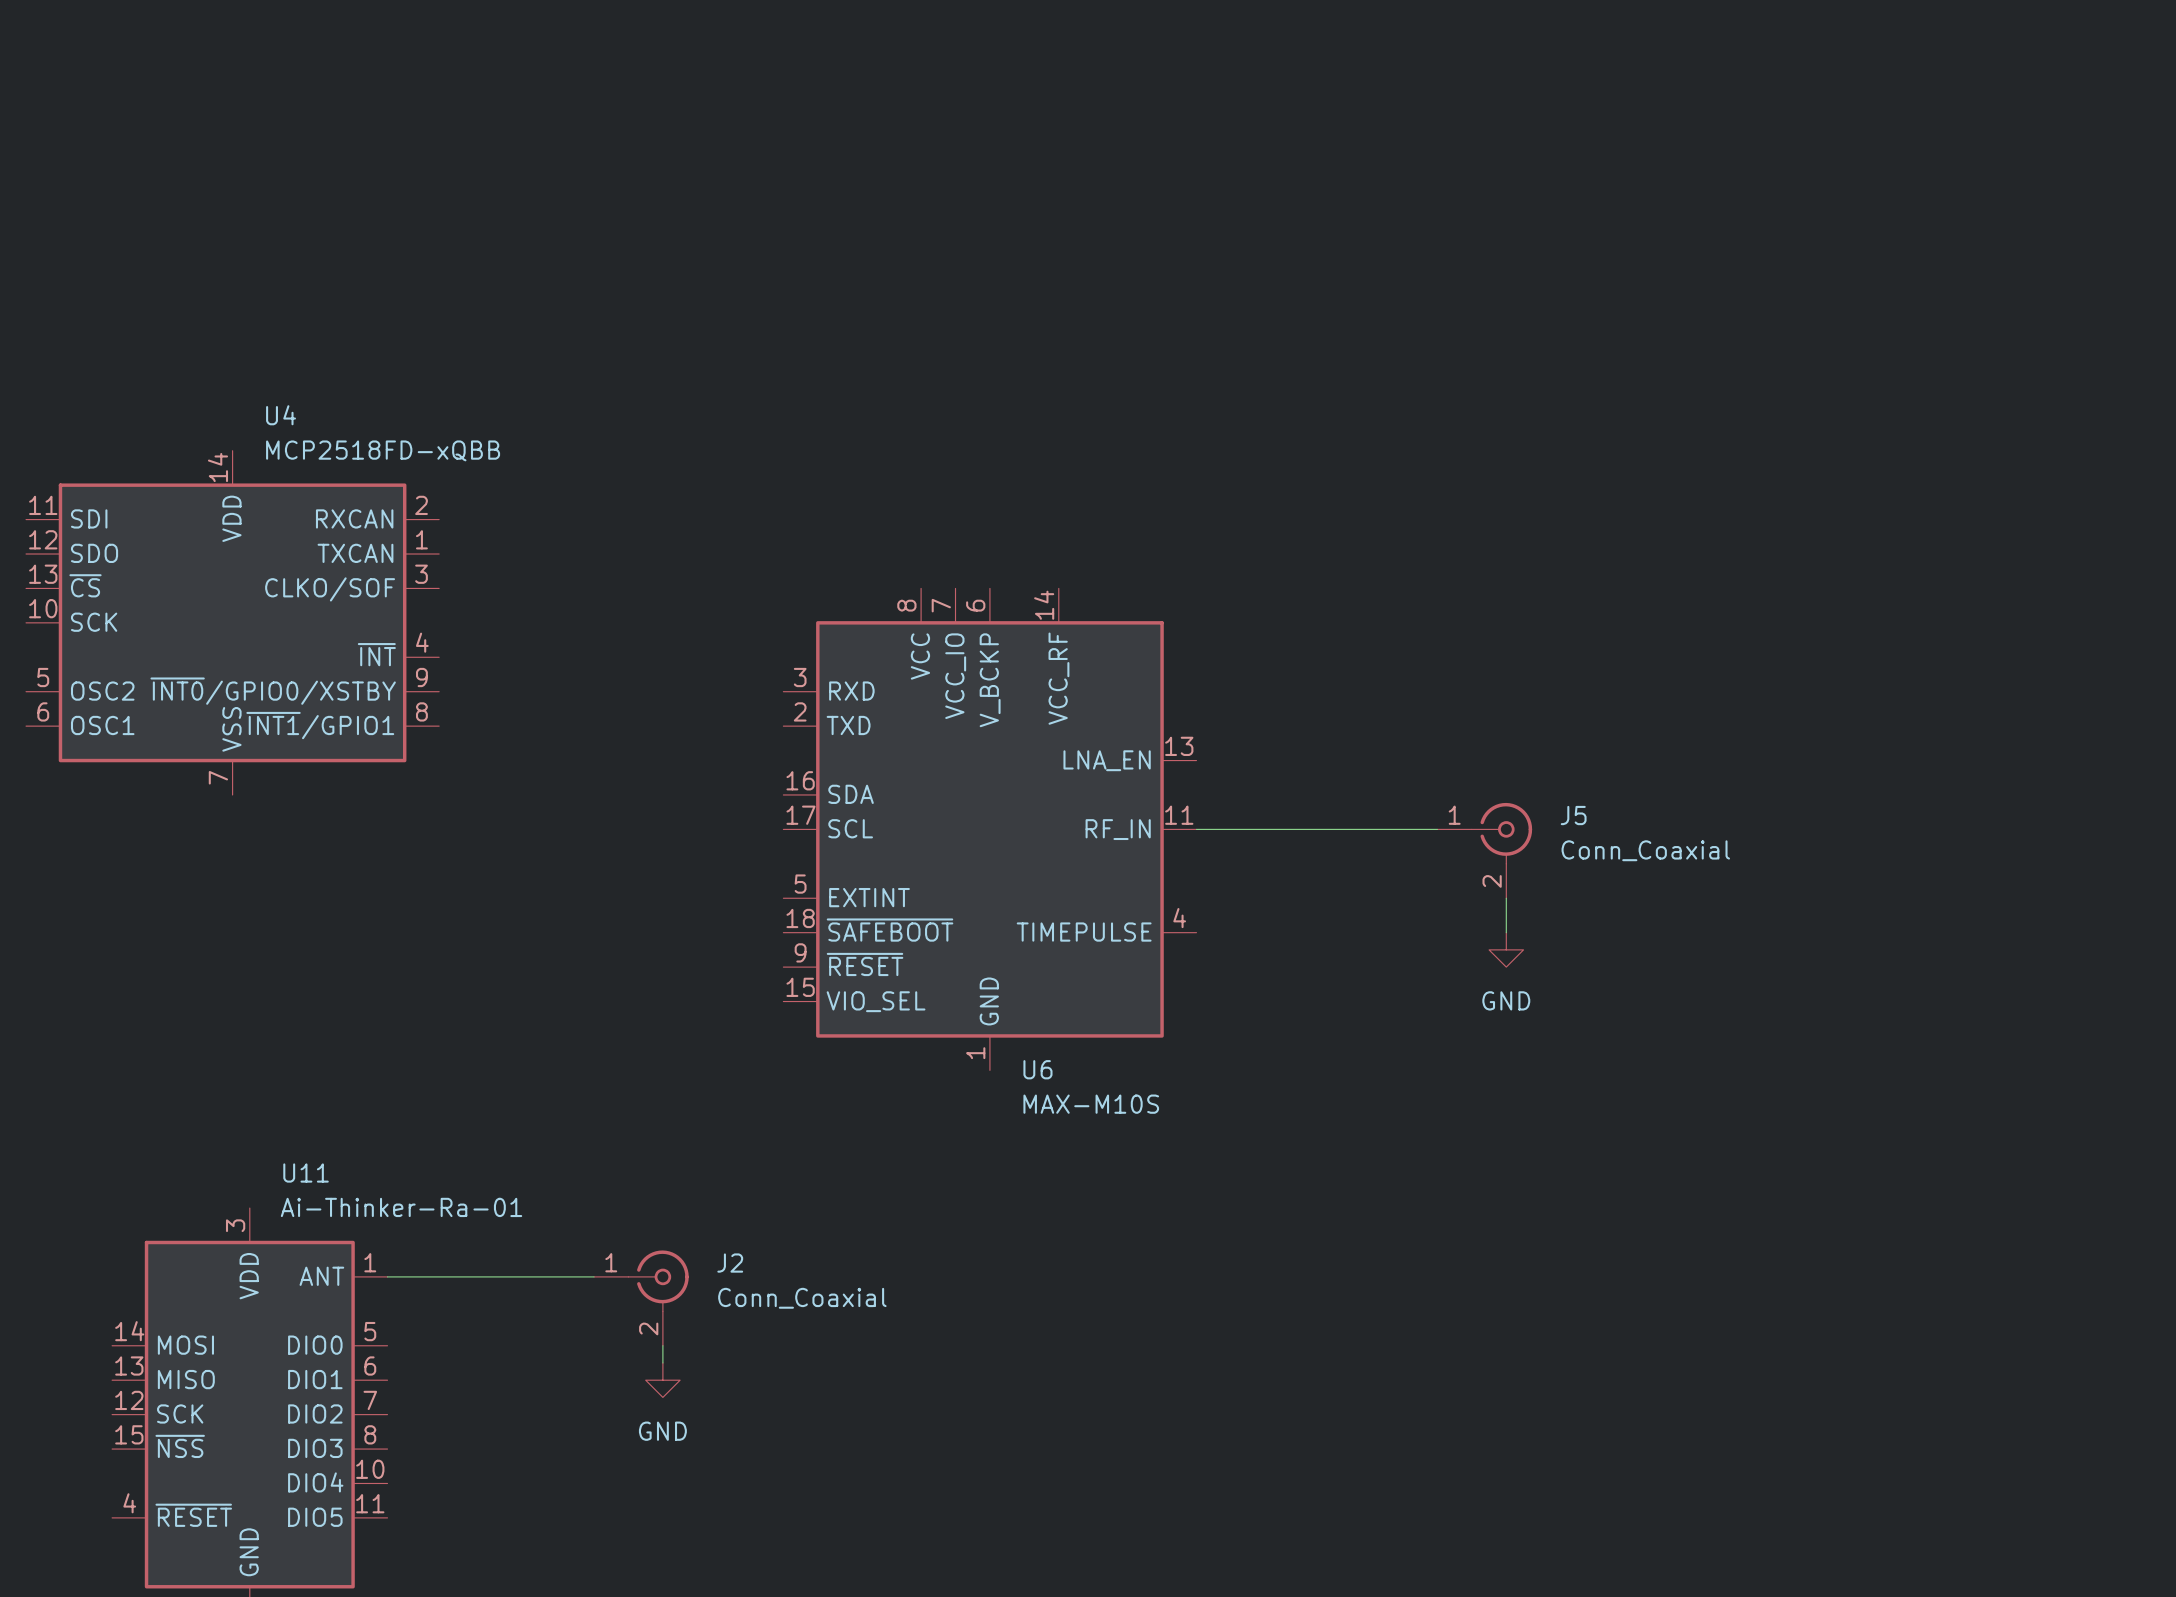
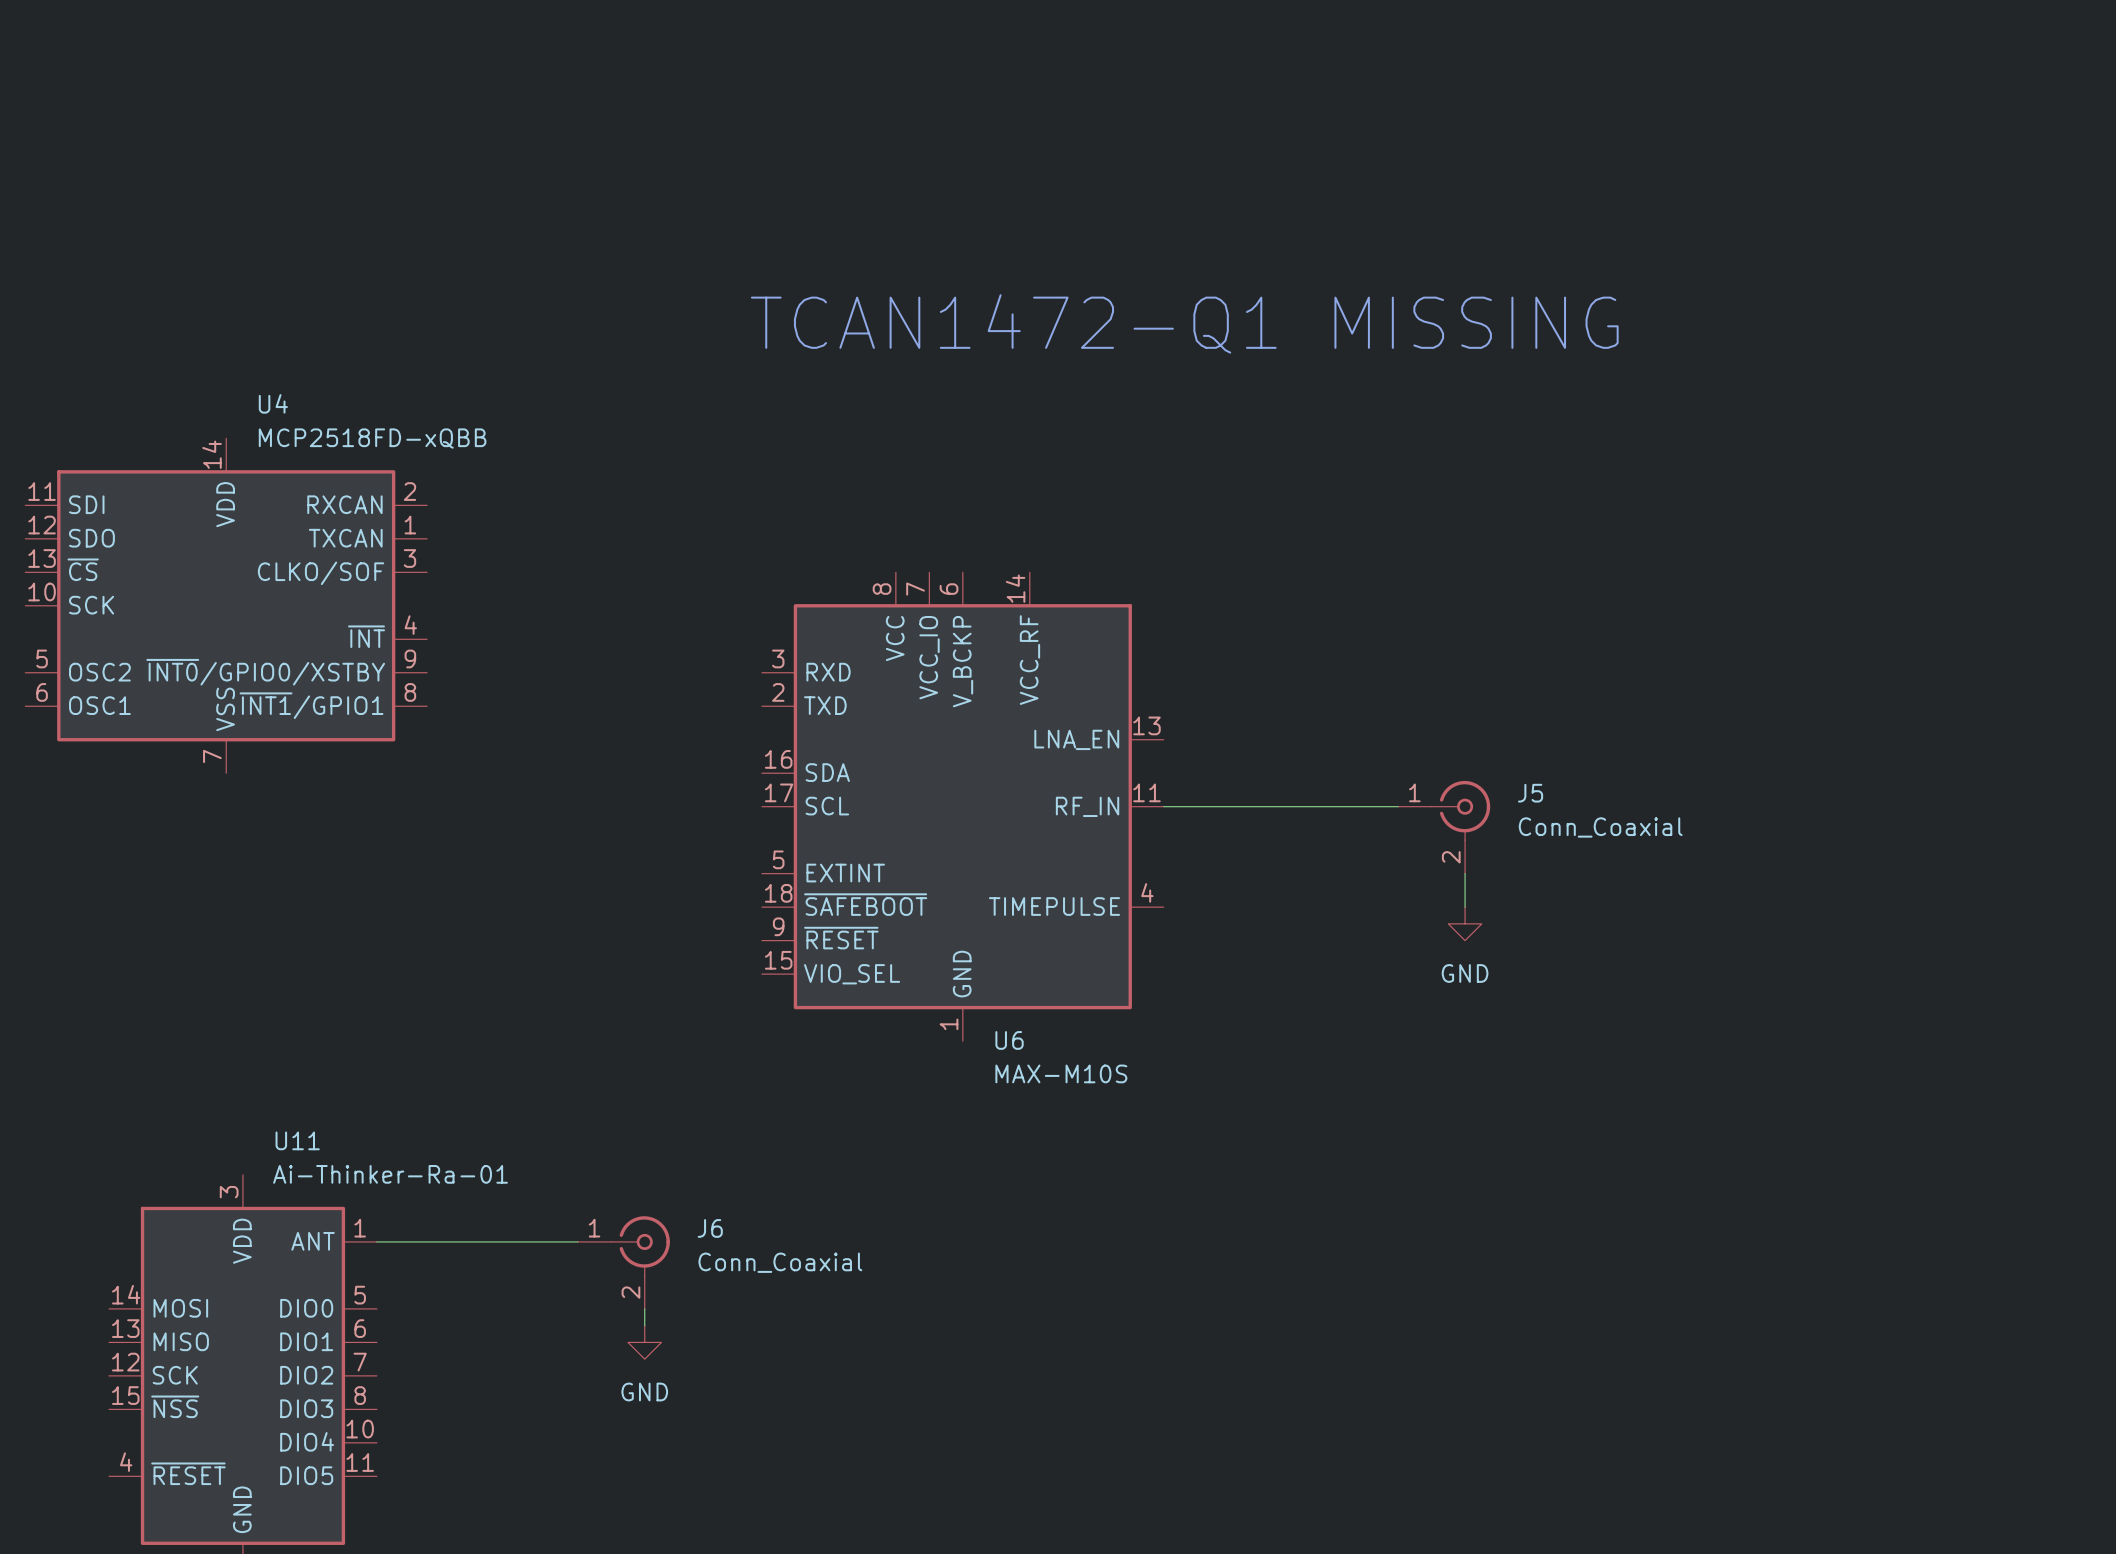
text: none -> TCAN1472-Q1 MISSING (1184, 323)
J2 name: J2 (730, 1263) -> J6 (710, 1228)

